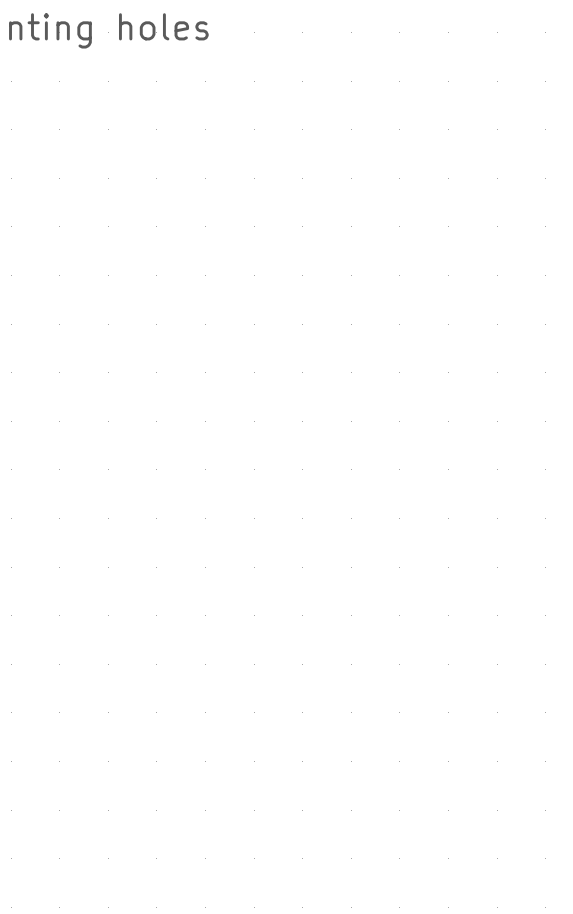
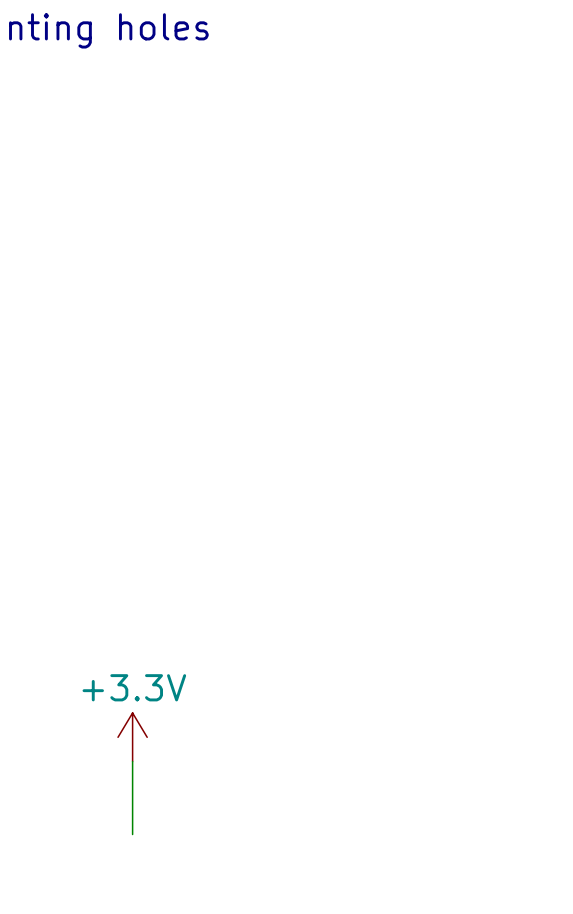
power symbol: none -> +3.3V (132, 737)
wire: none -> (132, 761) (132, 834)

